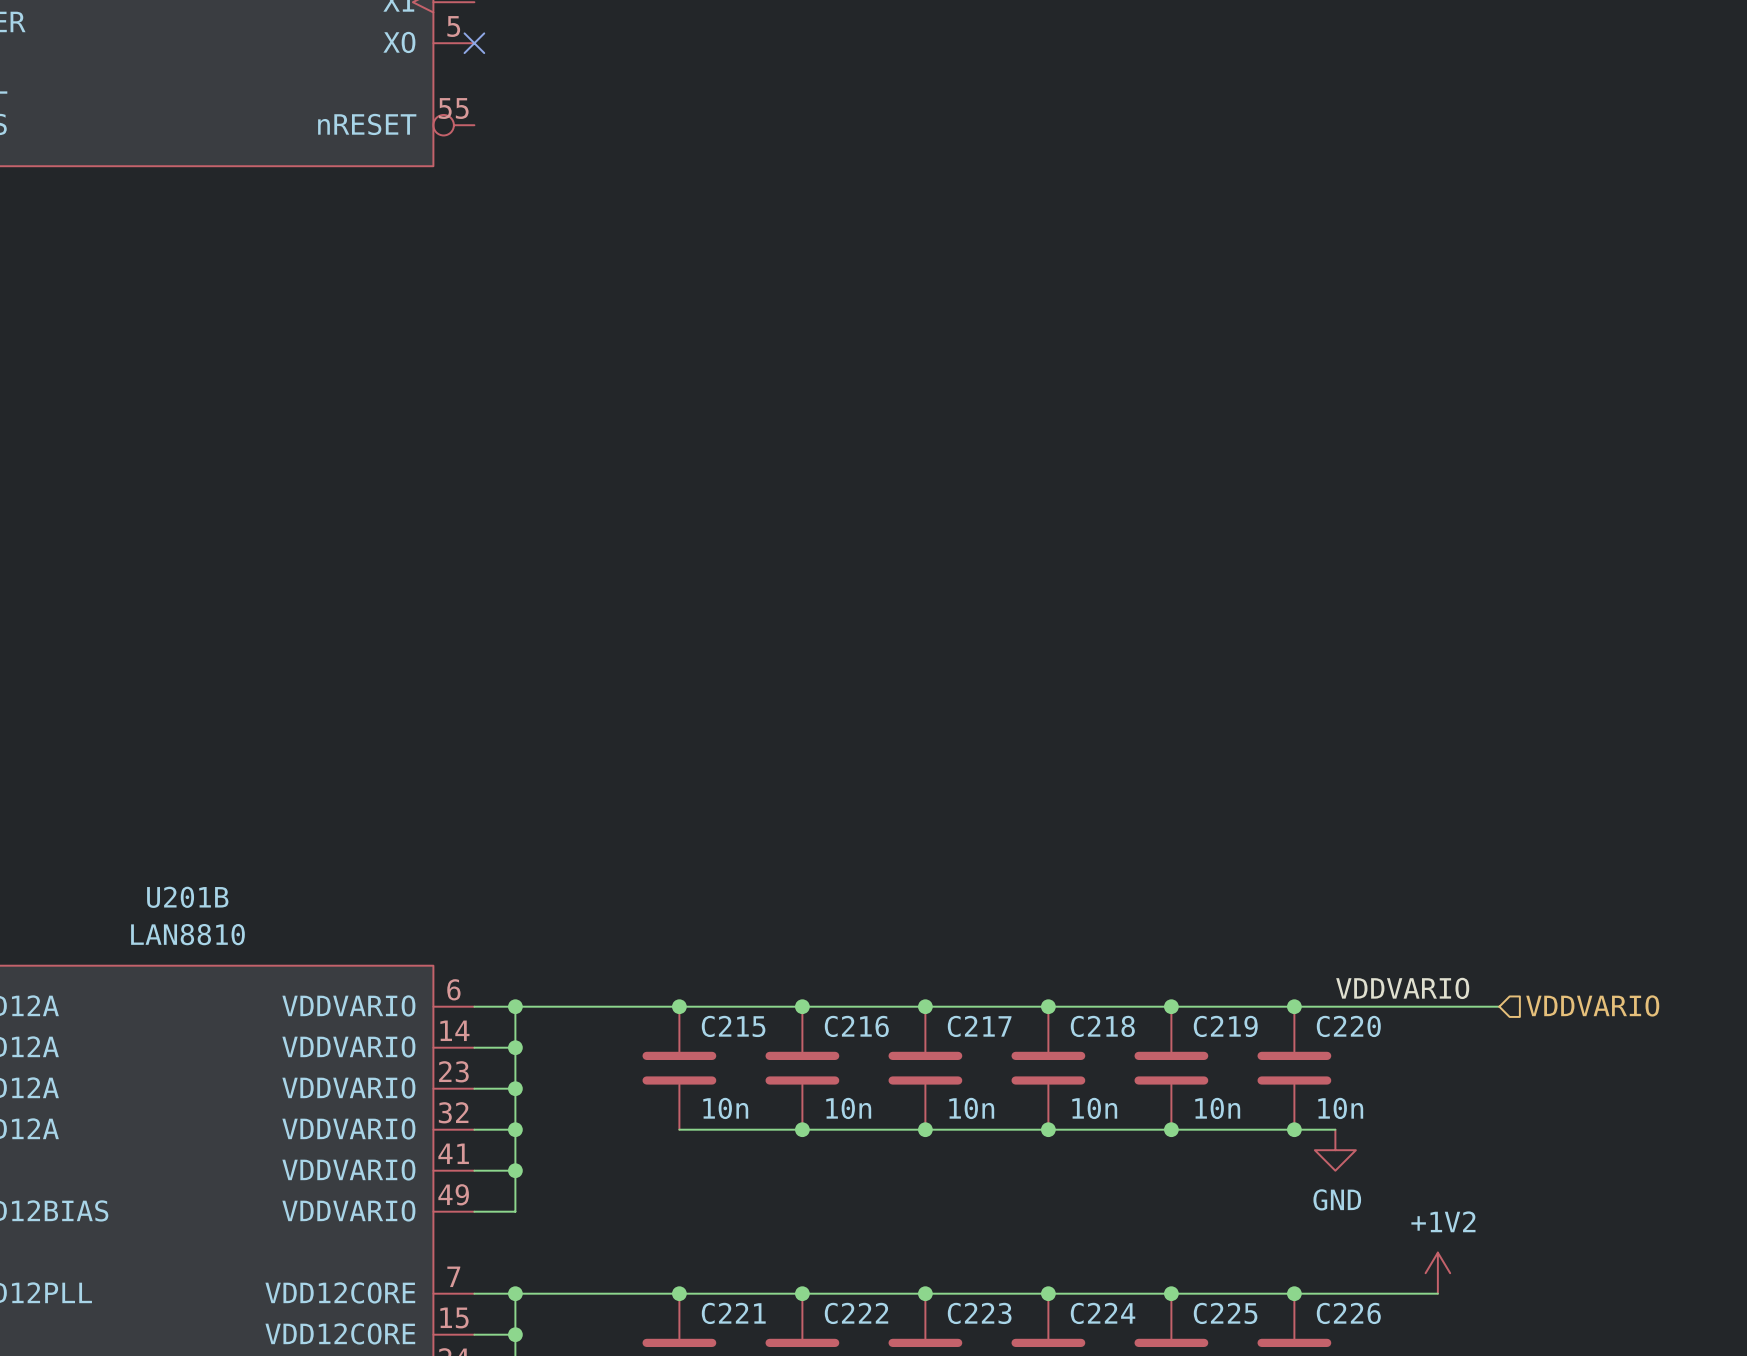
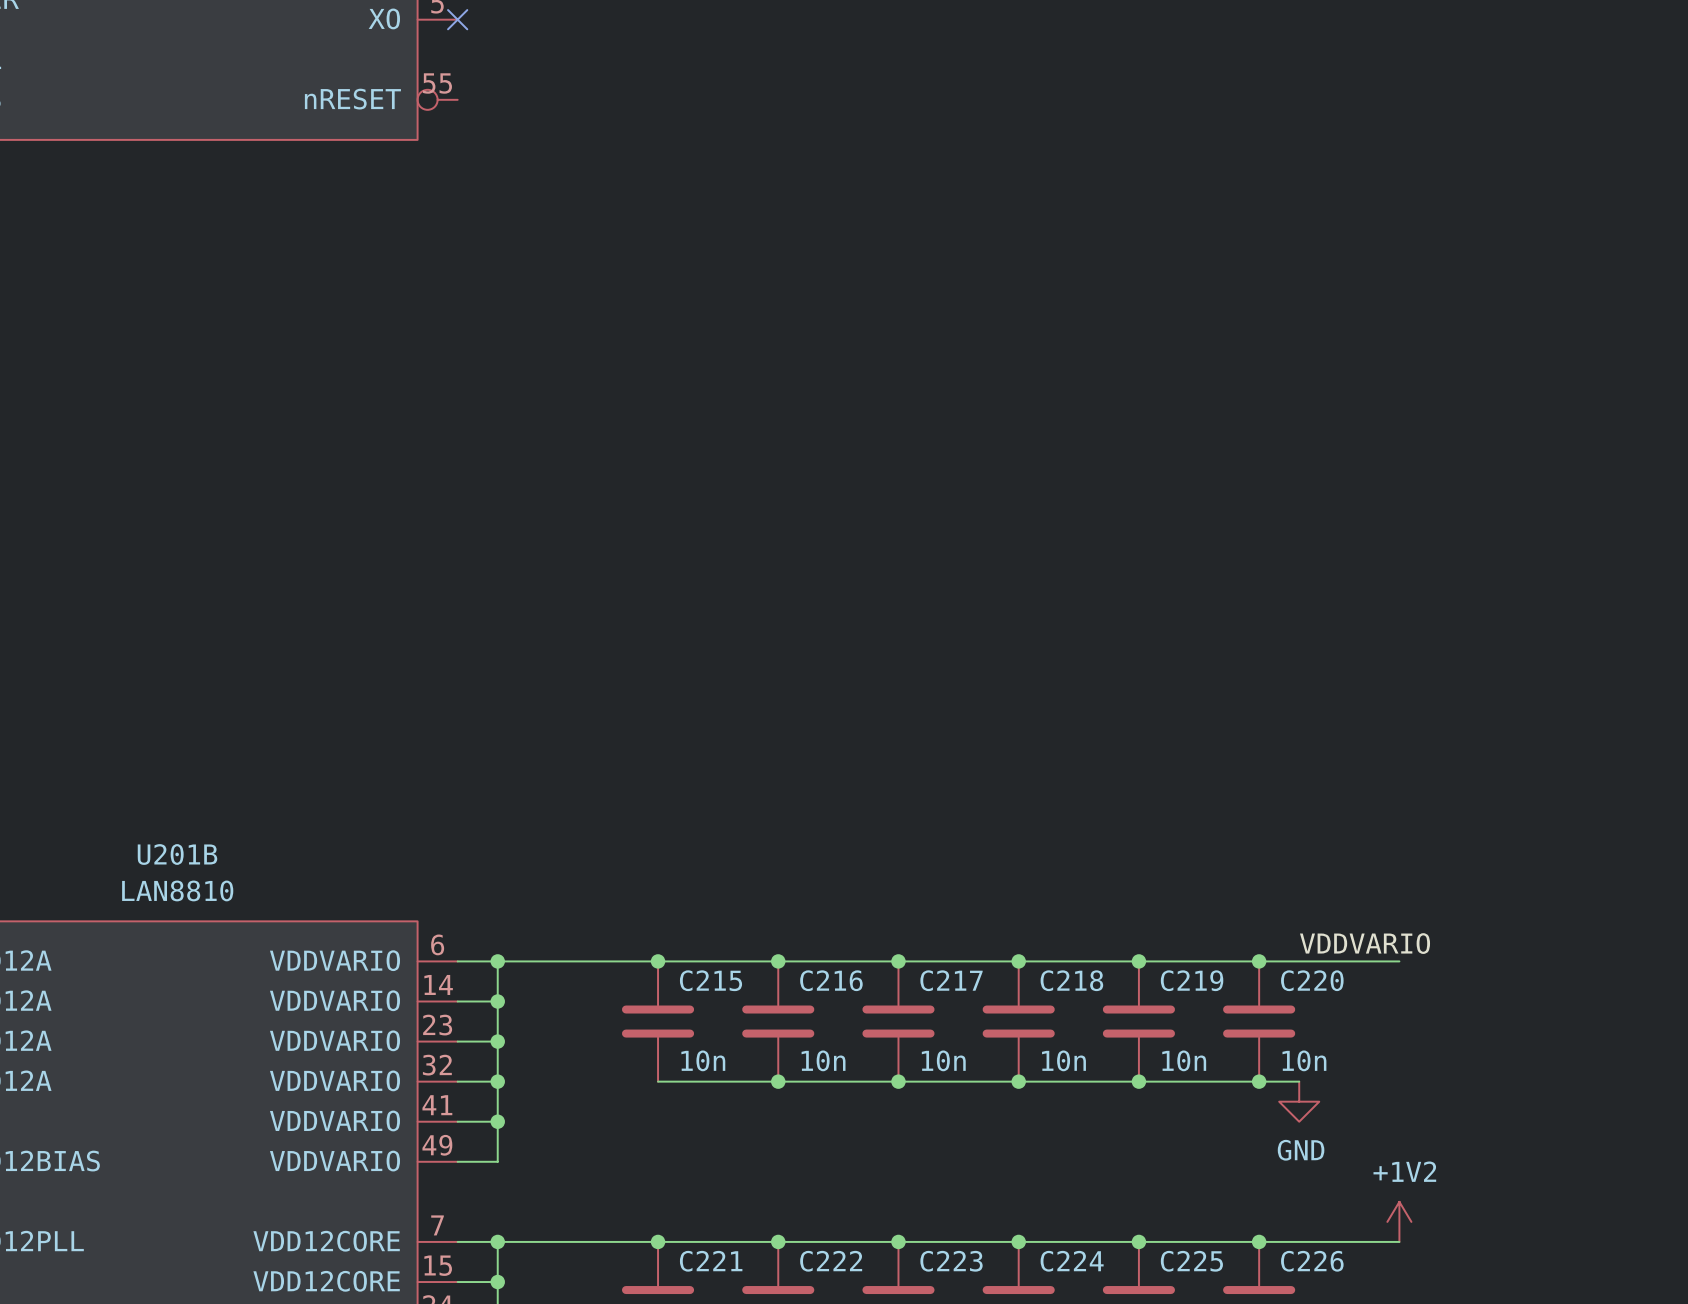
hierarchical label: VDDVARIO (1592, 1005) -> none
wire: (1437, 1006) (1499, 1006) -> none

